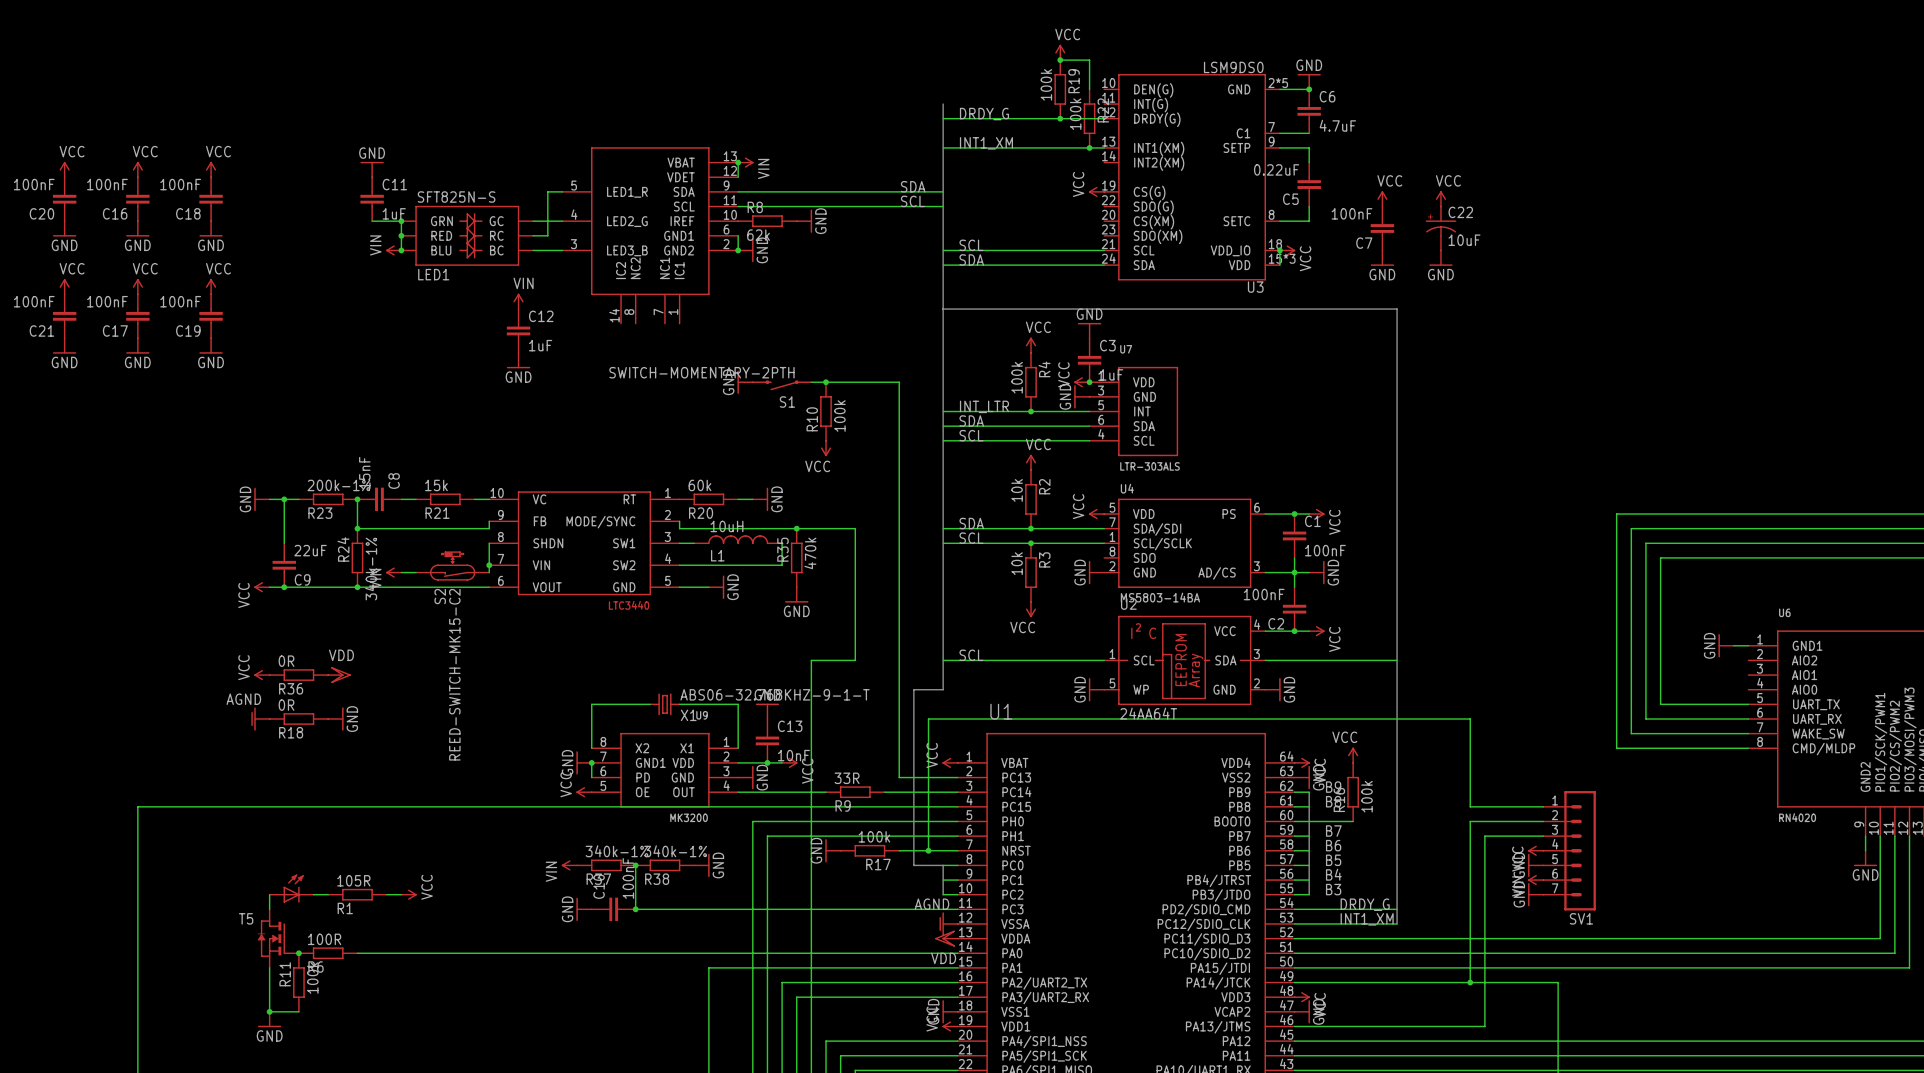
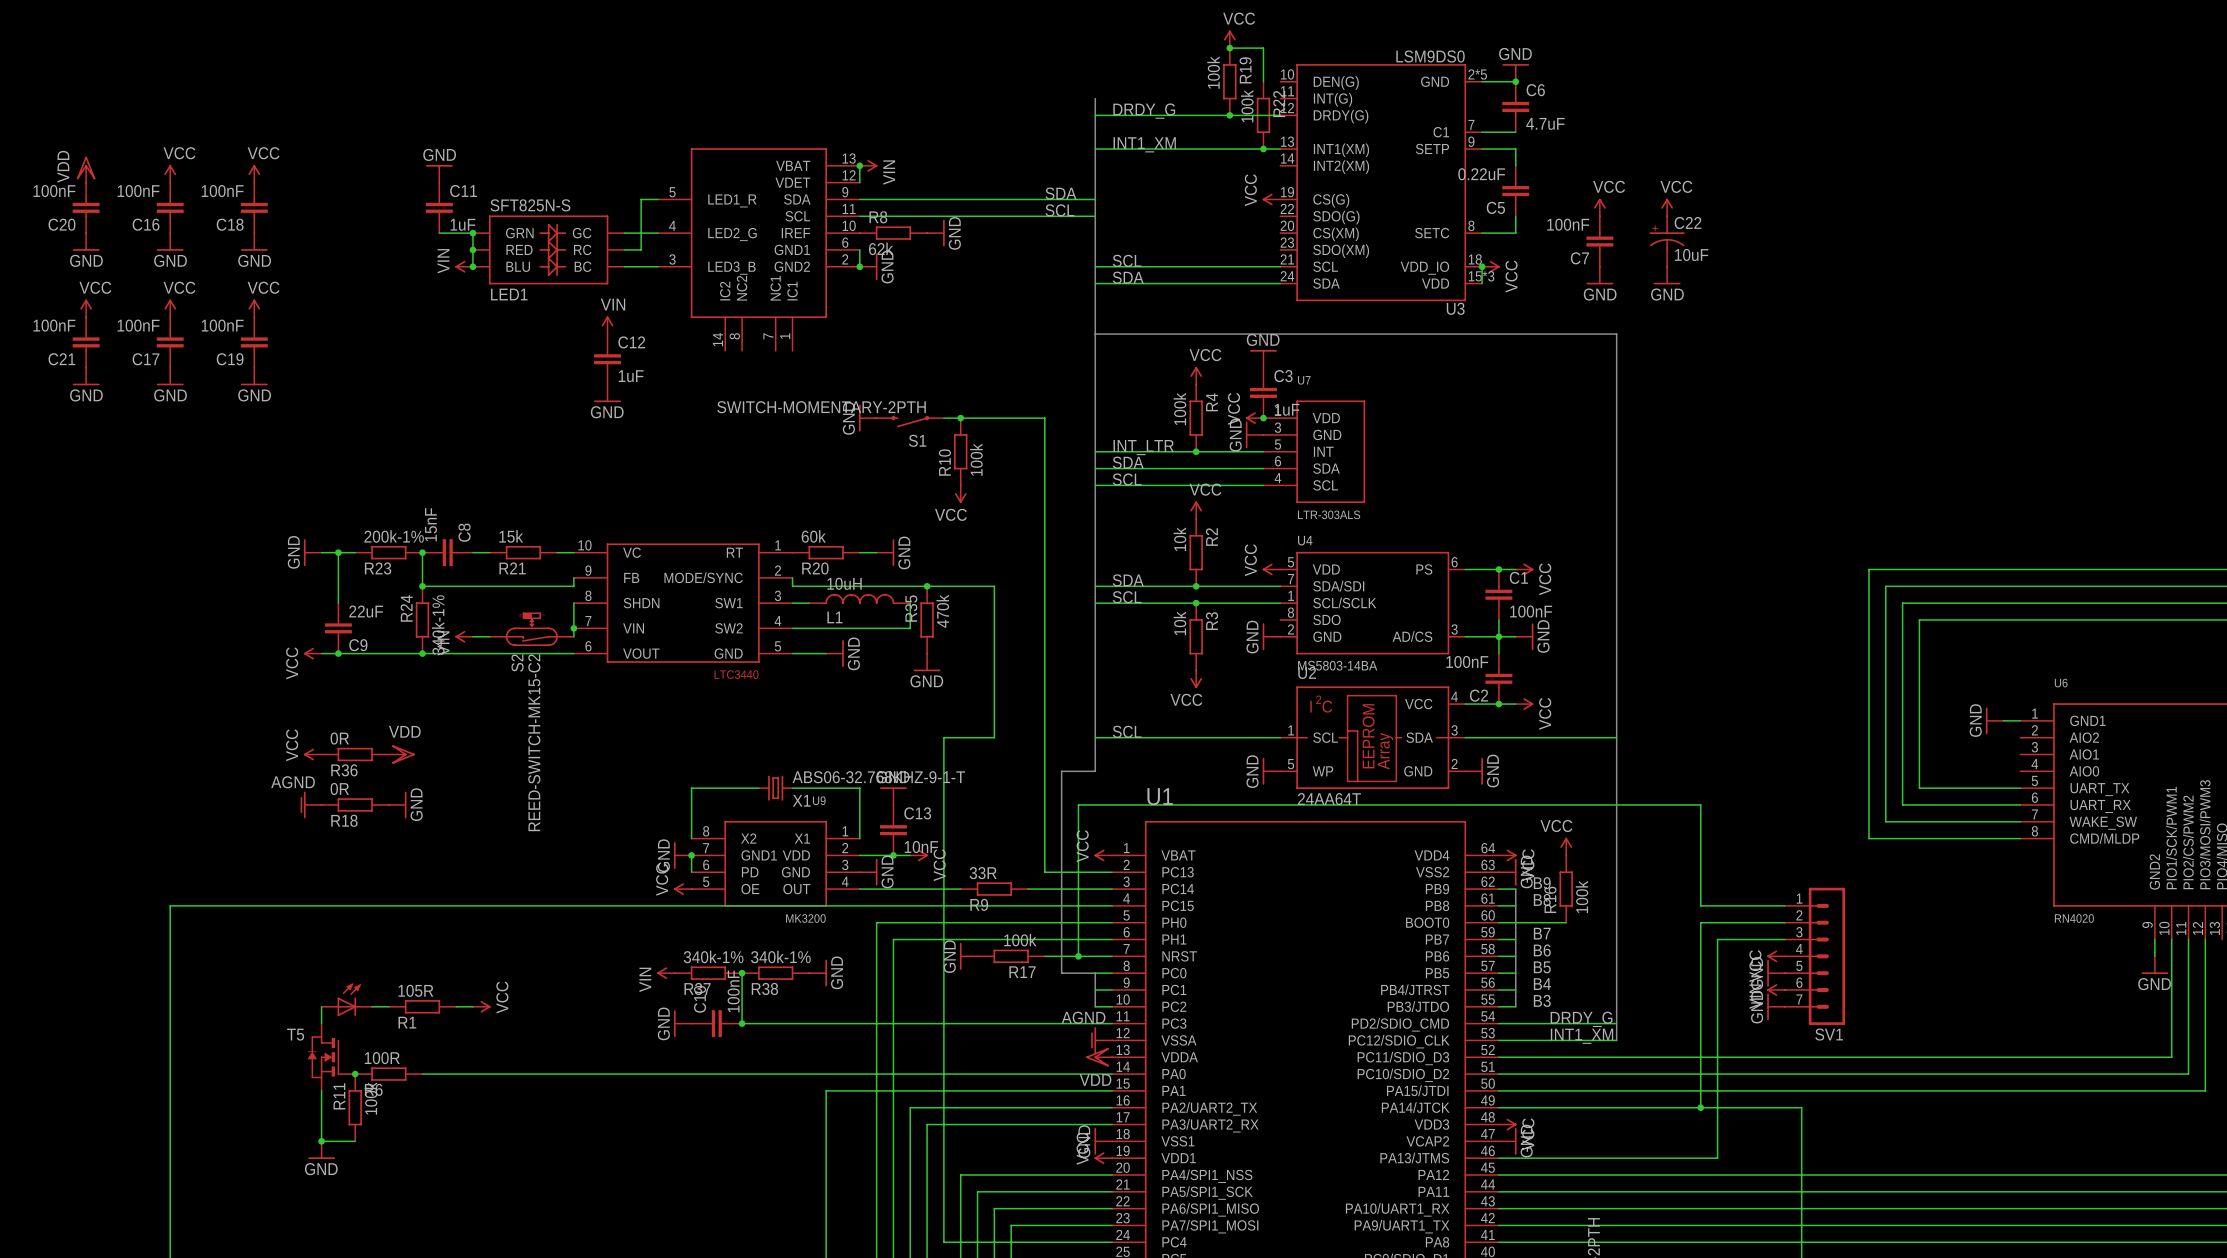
power symbol: VCC (64, 169) -> VDD (86, 169)

